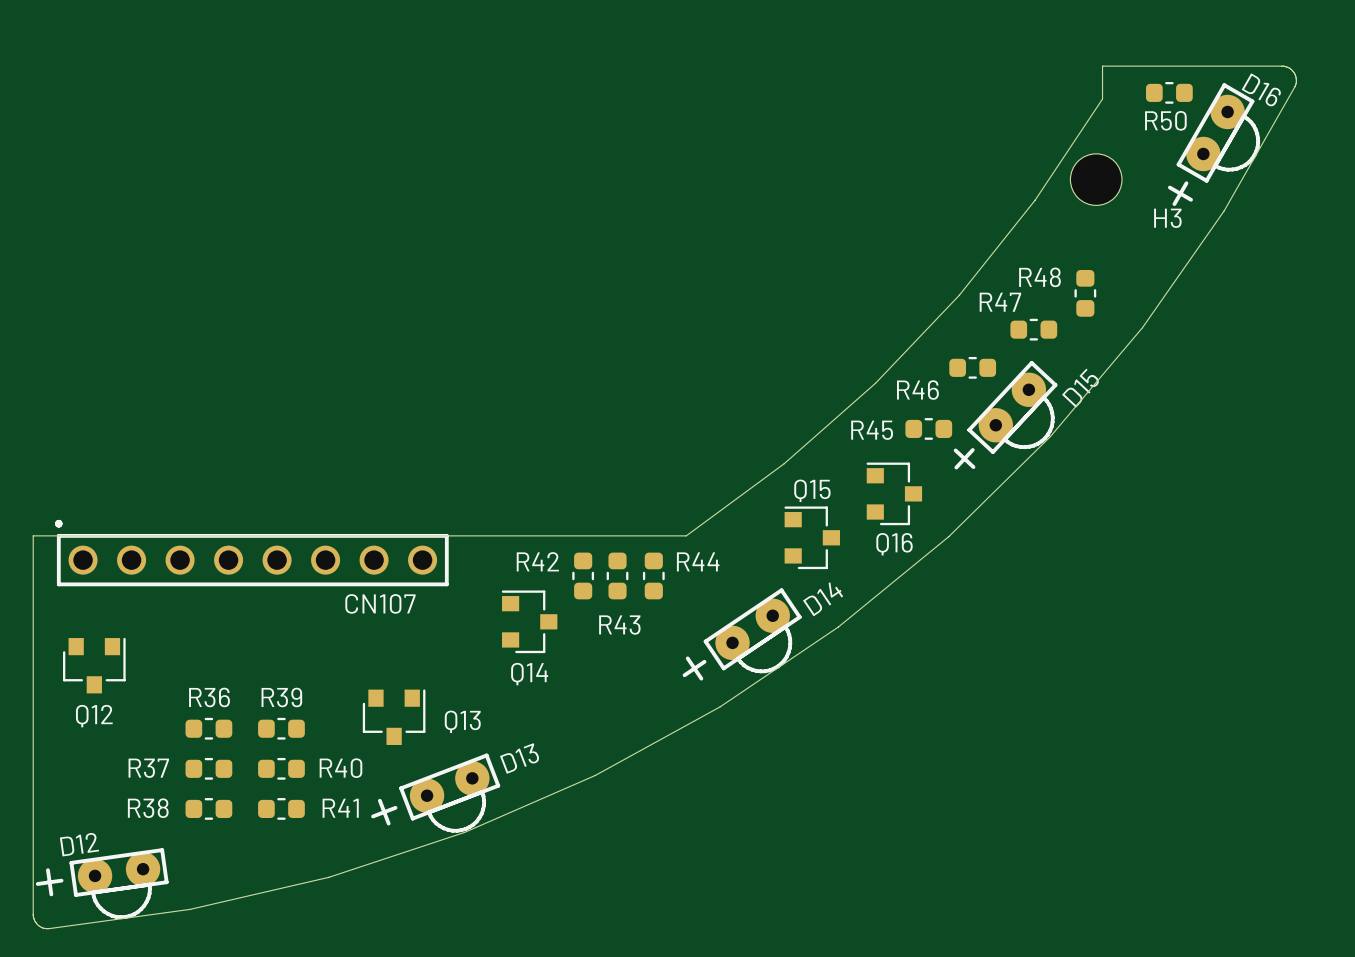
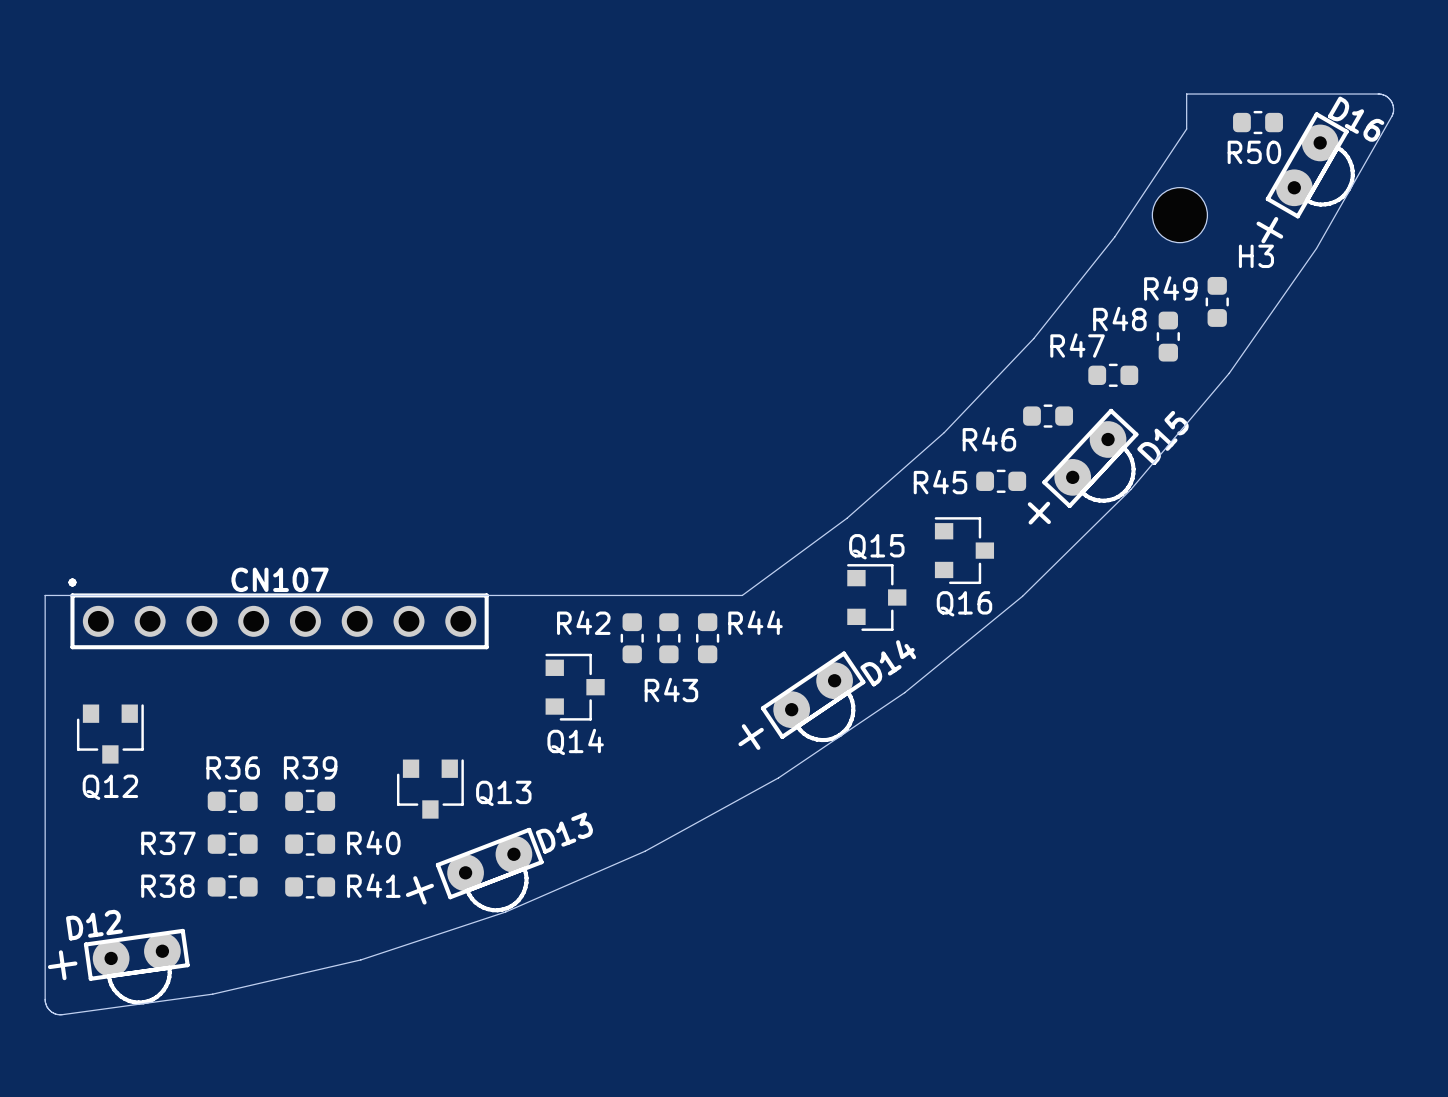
R49: none -> (1217, 301)
CN107 name position: CN107 (380, 603) -> CN107 (280, 579)

